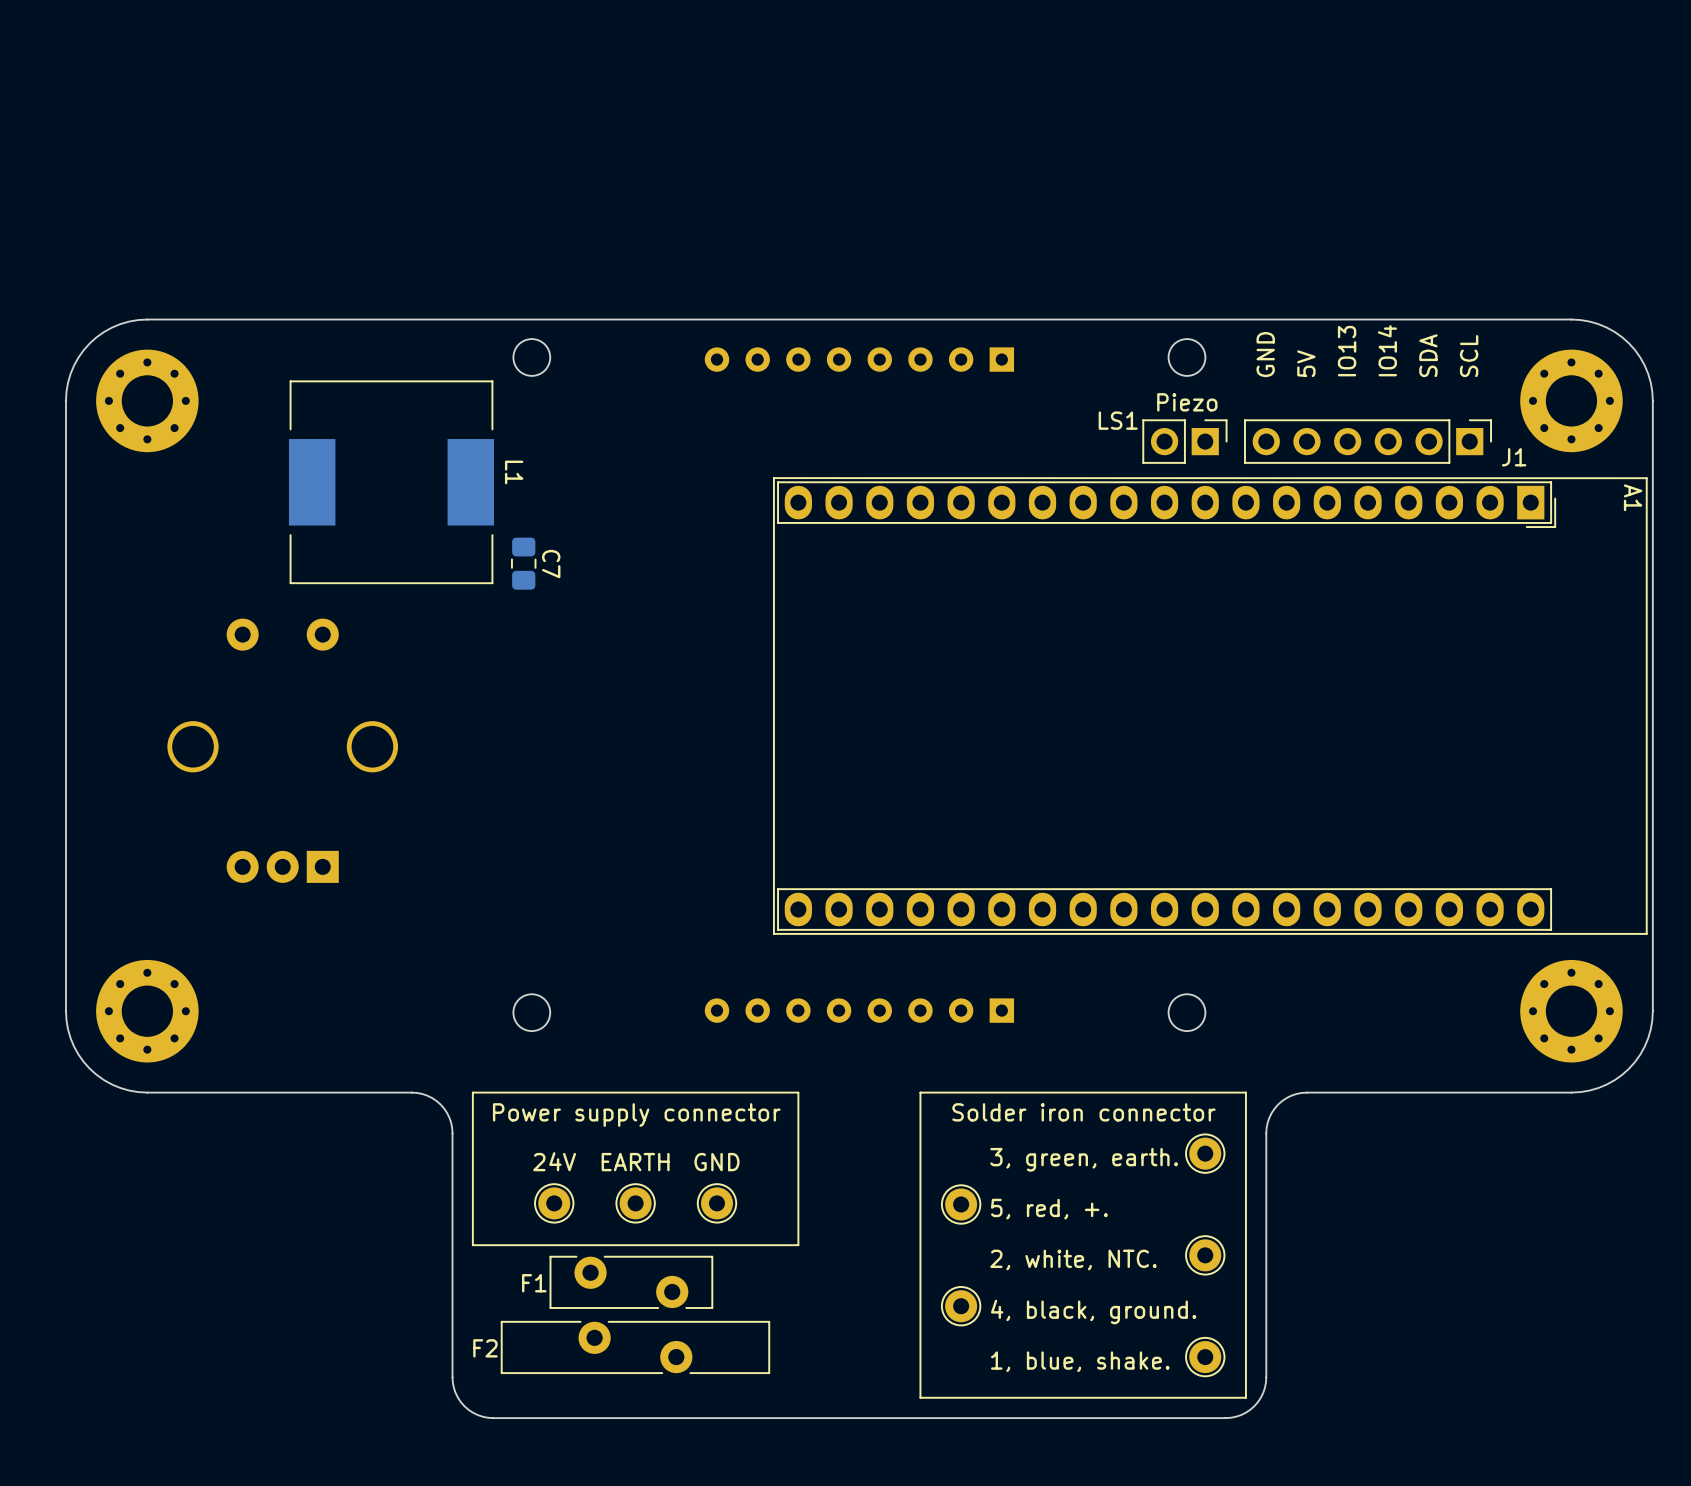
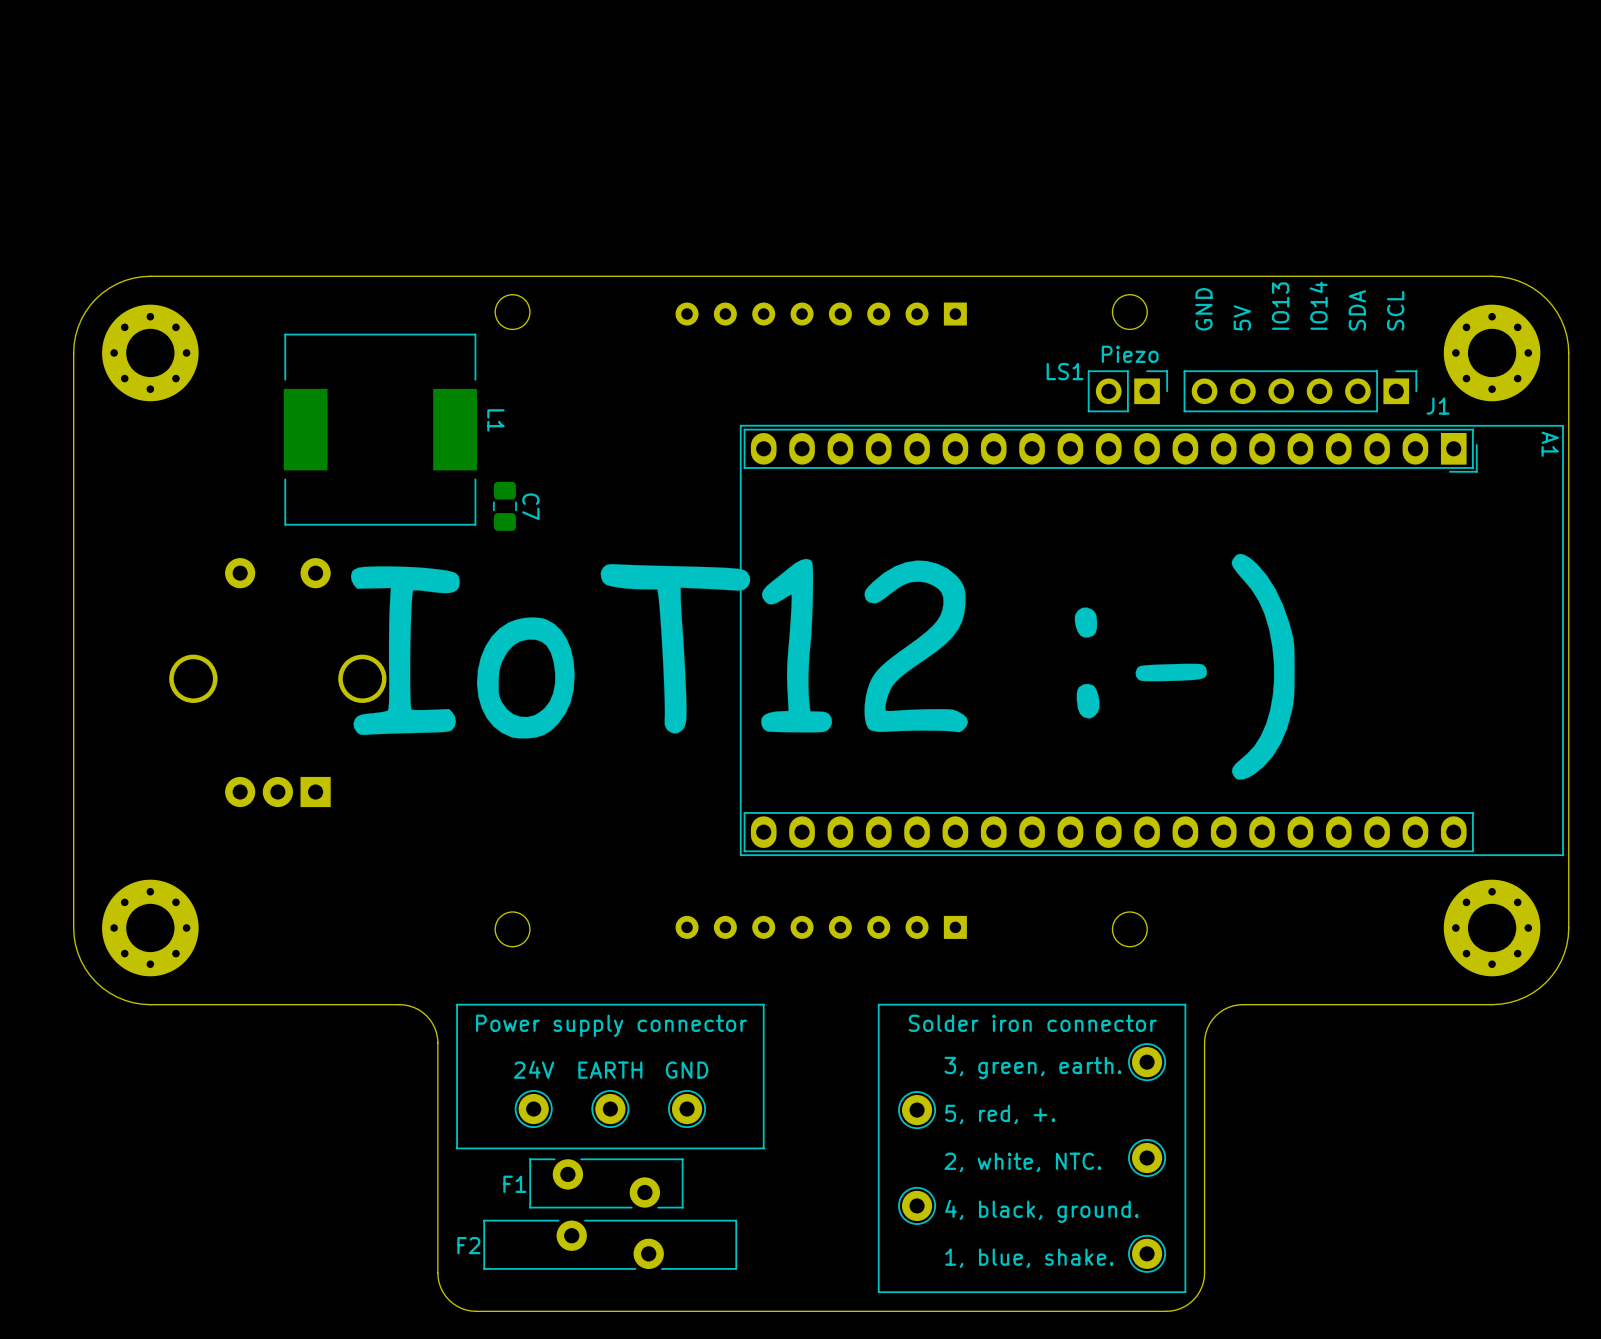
drawing: none -> [350, 553, 1295, 780]

